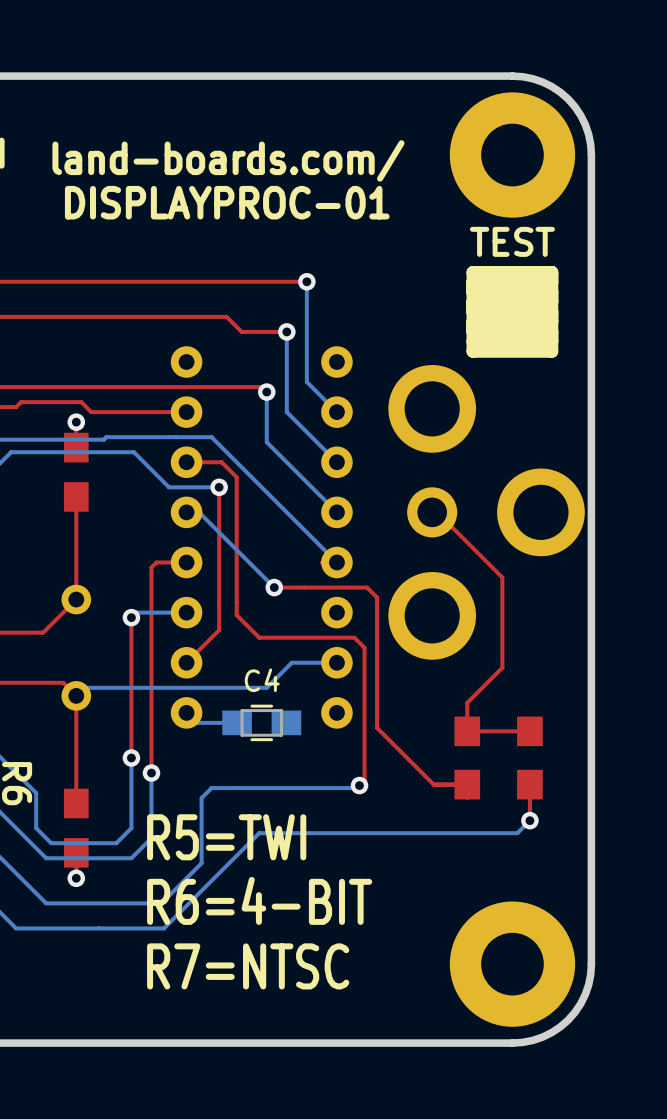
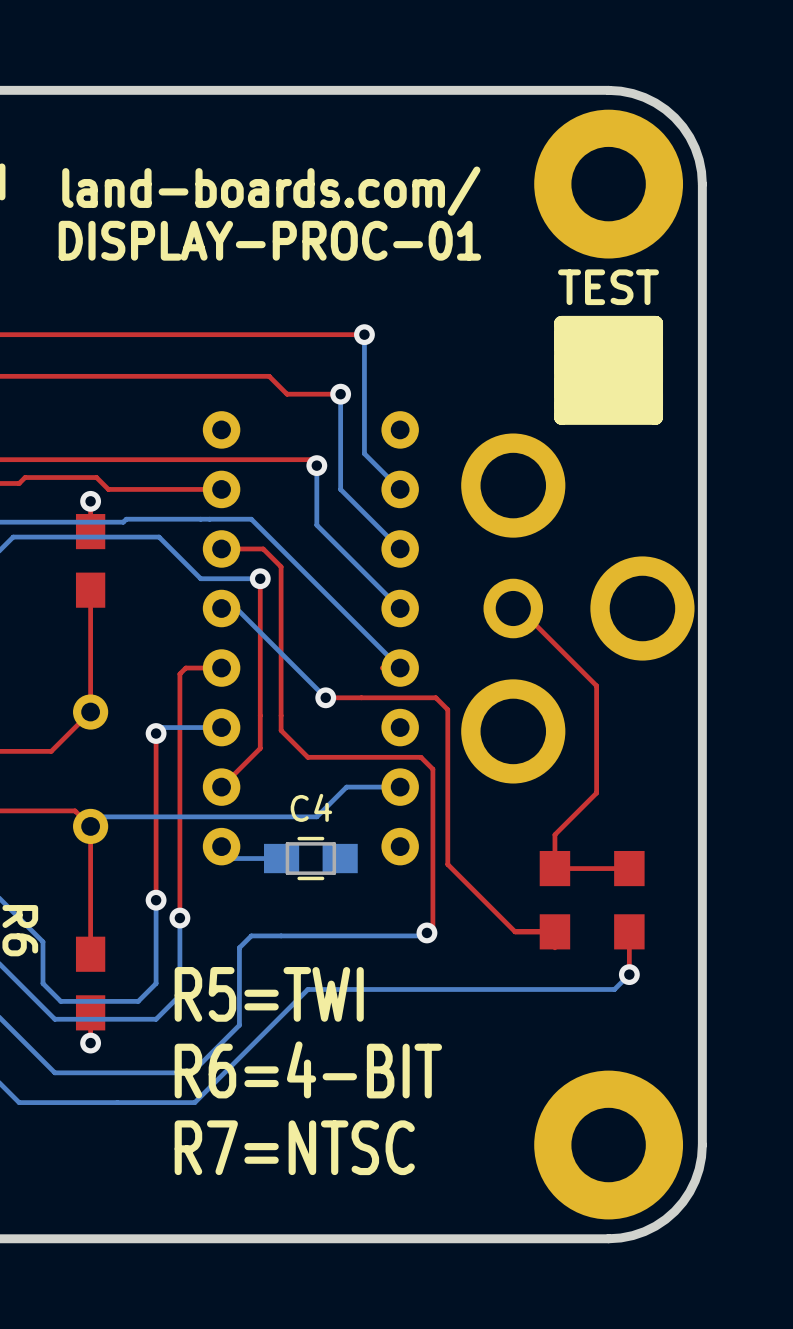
text: DISPLAYPROC-01 (227, 202) -> DISPLAY-PROC-01 (269, 240)

